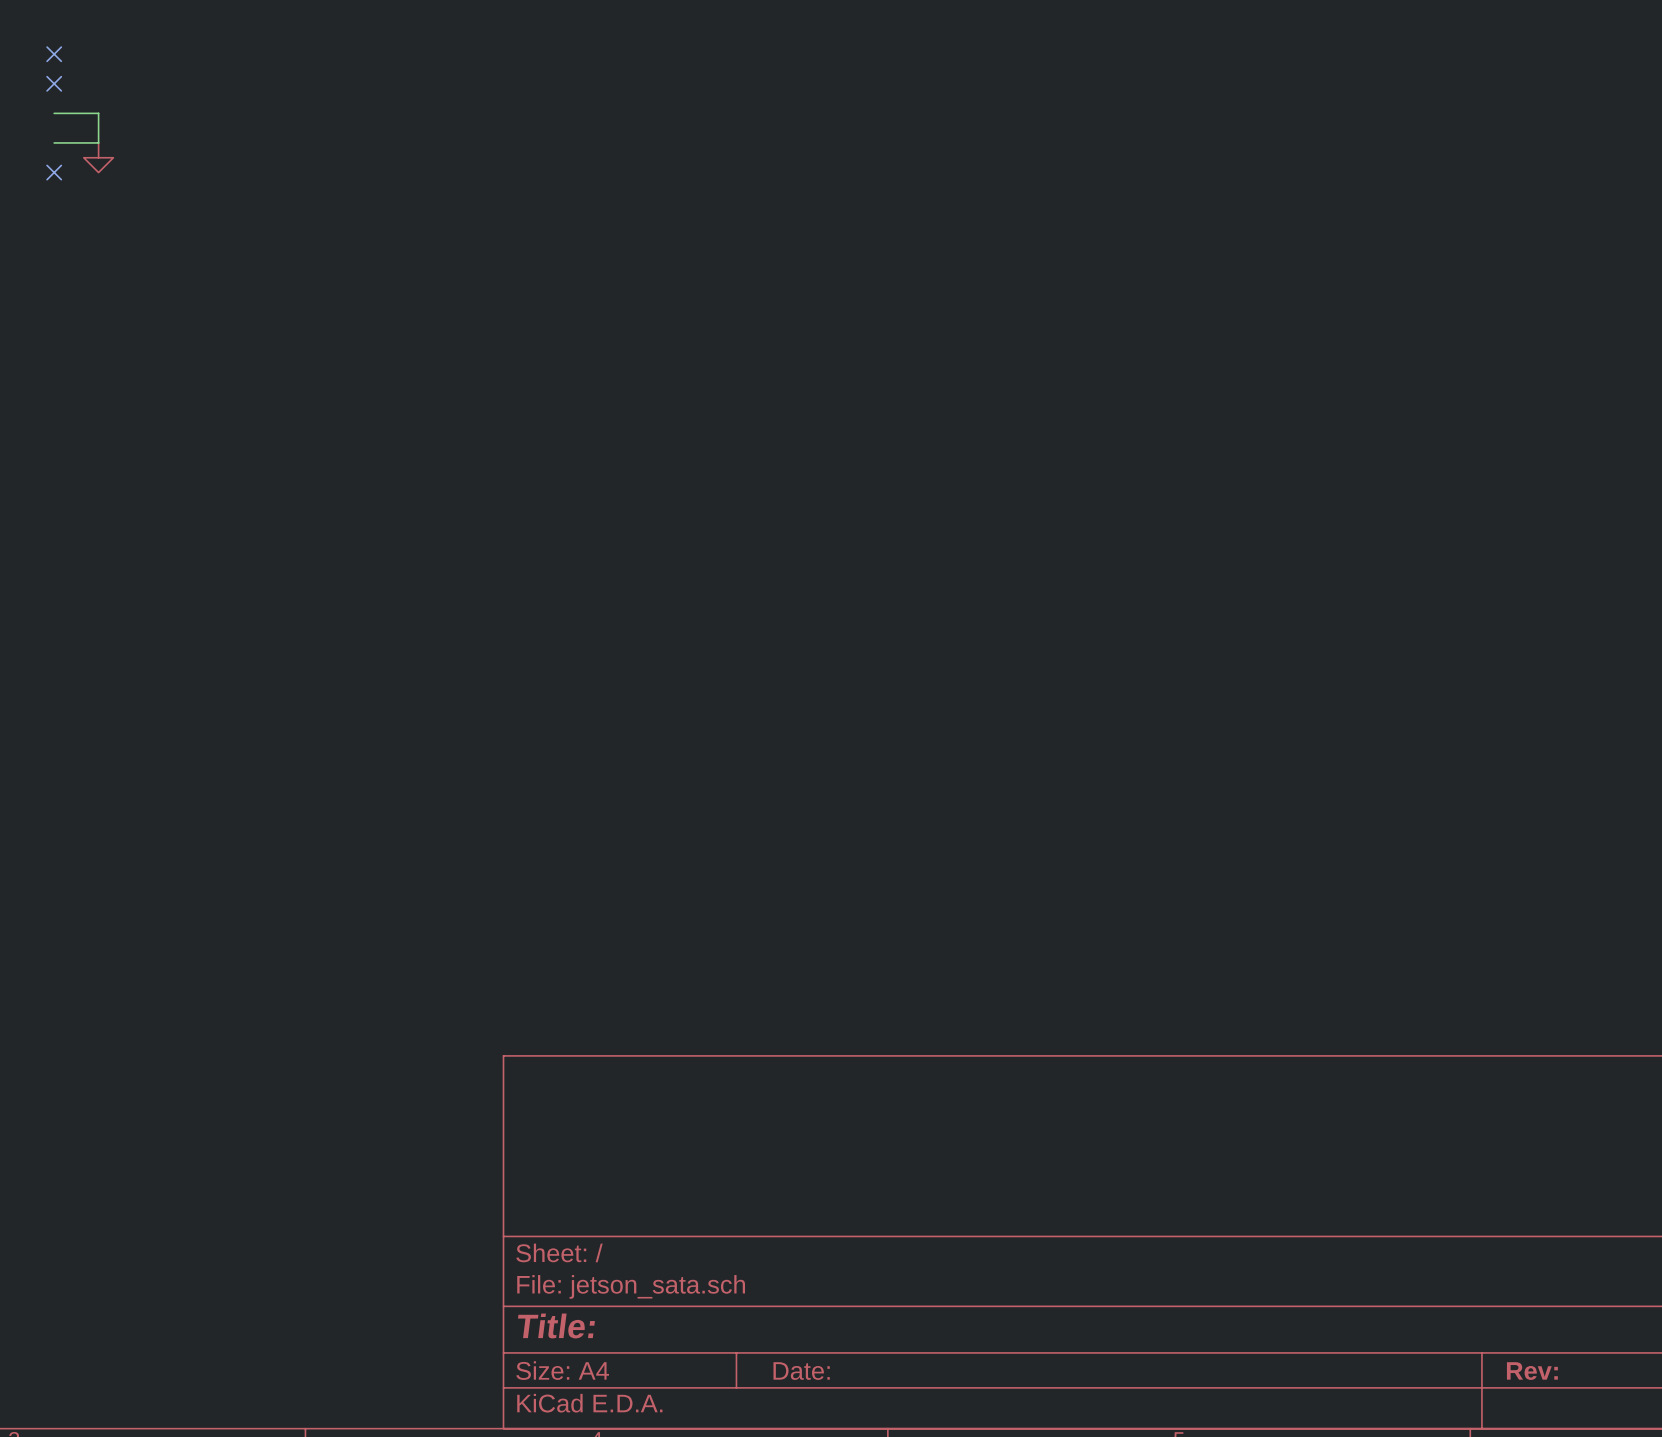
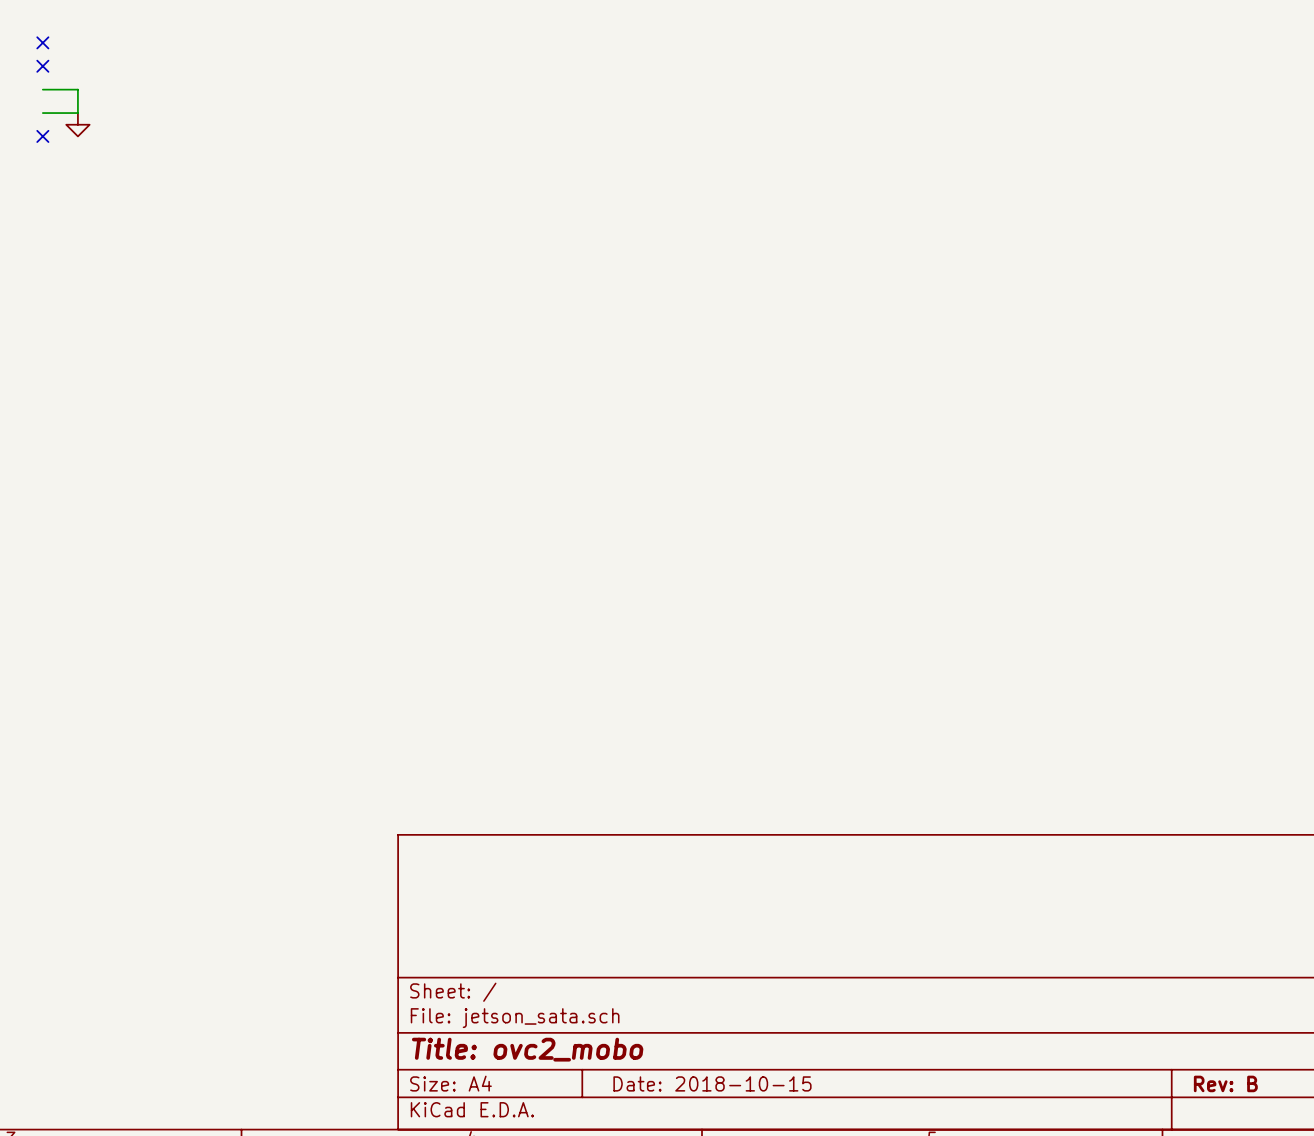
title block: Title: (556, 1325) -> Title: ovc2_mobo (527, 1049)
title block: Date: (801, 1371) -> Date: 2018-10-15 (712, 1083)
title block: Rev: (1532, 1371) -> Rev: B (1225, 1083)

